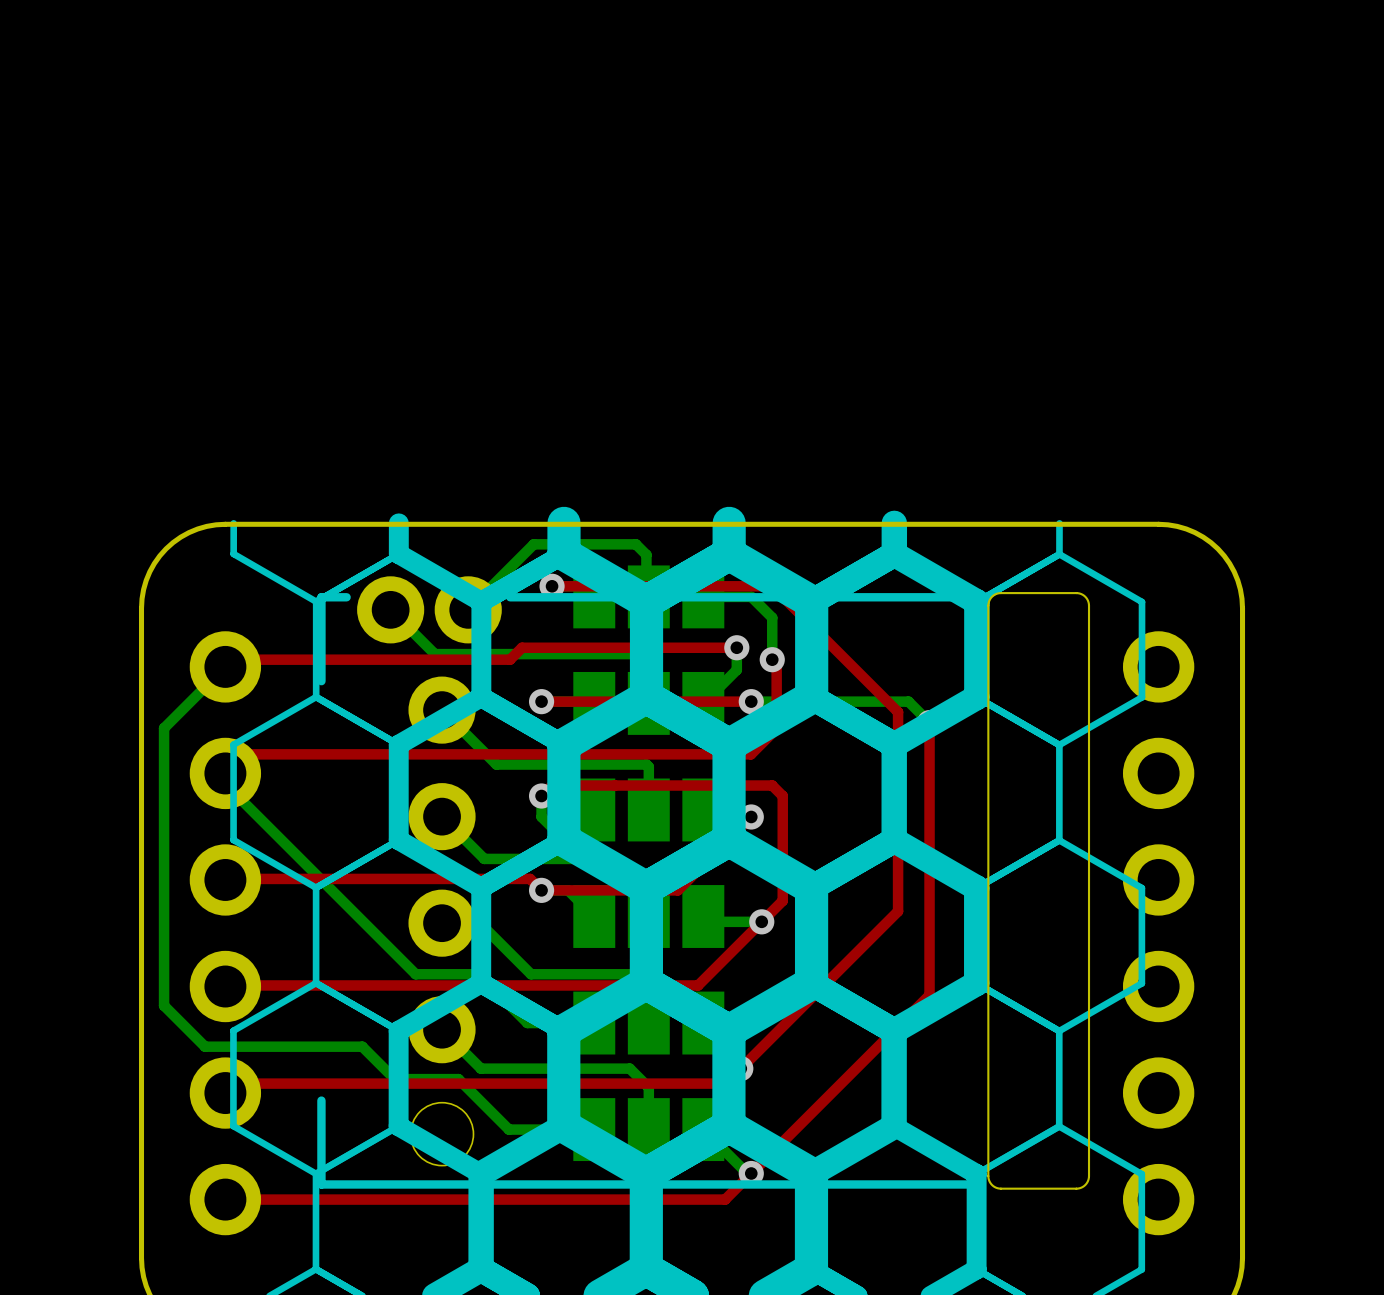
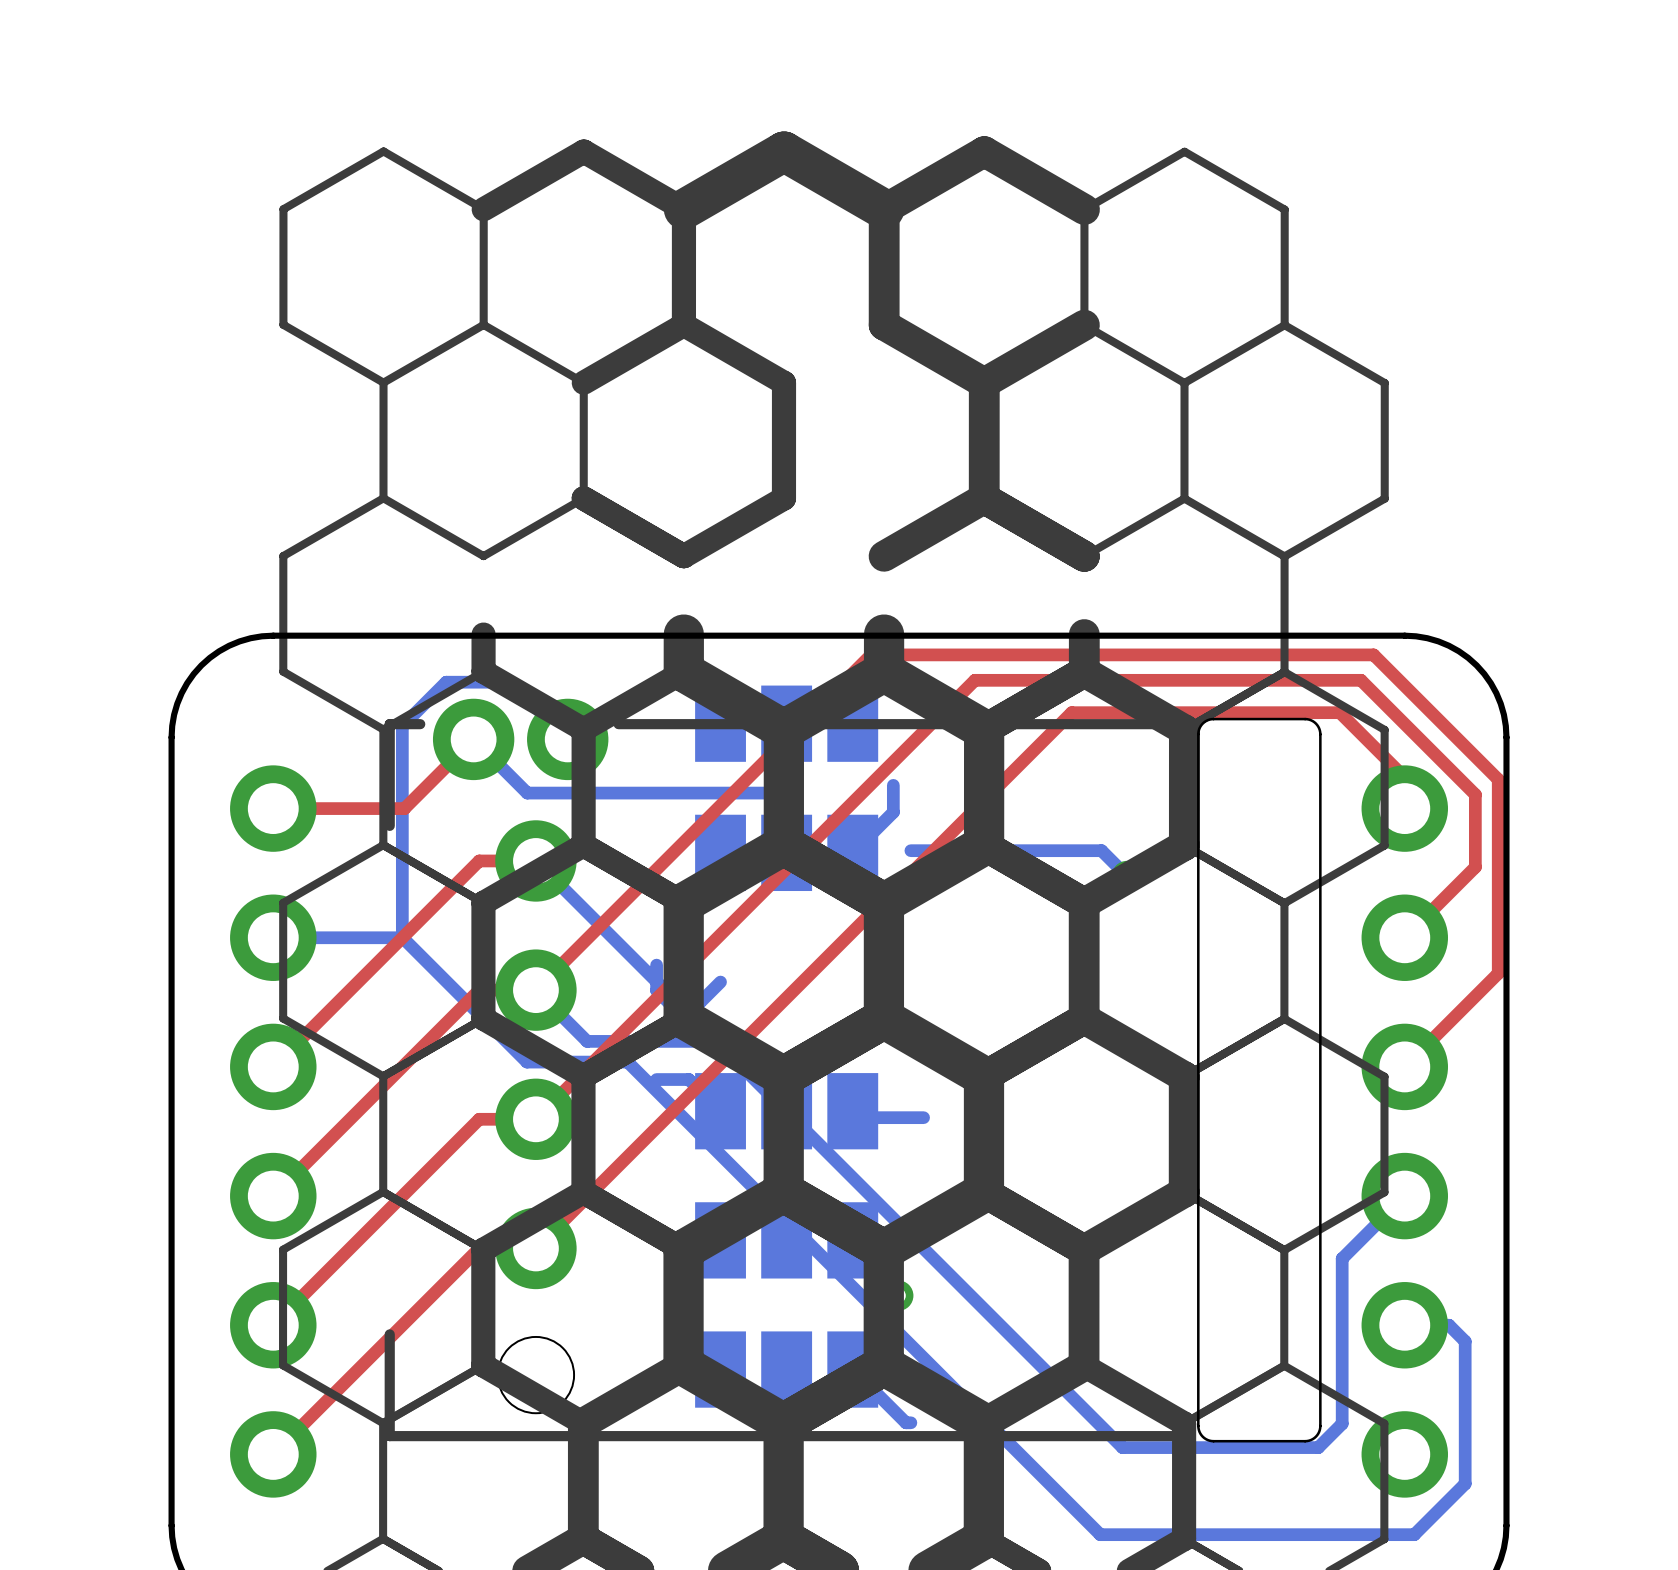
line: none -> (483, 209) (483, 324)
line: none -> (483, 209) (383, 151) (283, 209) (283, 324) (383, 382)
line: none -> (483, 209) (583, 151) (683, 209)
line: none -> (683, 209) (784, 151) (884, 209)
line: none -> (683, 209) (683, 324)
line: none -> (884, 209) (884, 325) (984, 382)
line: none -> (884, 209) (984, 151) (1084, 209)
line: none -> (1084, 209) (1084, 325)
line: none -> (1084, 209) (1184, 151) (1284, 209) (1284, 325)
line: none -> (483, 324) (383, 382)
line: none -> (483, 324) (583, 382)
line: none -> (683, 324) (583, 382)
line: none -> (683, 324) (784, 382) (783, 498) (683, 556)
line: none -> (1084, 325) (1184, 382)
line: none -> (1084, 325) (984, 382)
line: none -> (1284, 325) (1384, 383) (1384, 498) (1284, 556)
line: none -> (1284, 325) (1184, 382)
line: none -> (383, 382) (383, 498)
line: none -> (583, 382) (583, 498)
line: none -> (984, 382) (984, 498)
line: none -> (1184, 382) (1184, 498)
line: none -> (383, 498) (483, 556) (583, 498)
line: none -> (984, 498) (884, 556)
line: none -> (1184, 498) (1084, 556)
line: none -> (1184, 498) (1284, 556)
line: (233, 523) (233, 553) -> (383, 498) (283, 556) (283, 671)
line: (1059, 523) (1059, 554) -> (1284, 556) (1284, 672)
top track: (552, 586) (772, 586) (898, 712) (898, 911) (725, 1083) (234, 1083) -> (1404, 937) (1475, 867) (1475, 794) (1361, 680) (974, 680) (535, 1119) (479, 1119) (284, 1313)
via: (552, 586) -> none
bottom track: (648, 596) (646, 594) (646, 554) (635, 544) (533, 544) (468, 609) -> (1404, 1325) (1449, 1325) (1465, 1341) (1465, 1483) (1414, 1534) (1100, 1534) (627, 1062) (526, 1062) (402, 937) (402, 726) (446, 682) (510, 682) (567, 739)
bottom track: (703, 596) (751, 596) (772, 617) (772, 659) -> none
top track: (736, 647) (522, 647) (510, 659) (232, 659) (225, 666) -> (473, 739) (404, 808) (273, 808)
via: (736, 647) -> none
top track: (772, 659) (776, 664) (776, 728) (750, 754) (244, 754) (225, 773) -> none
via: (772, 659) -> none
bottom track: (225, 666) (164, 728) (164, 1005) (205, 1046) (362, 1046) (394, 1079) (458, 1079) (508, 1129) (594, 1129) -> none
top track: (541, 701) (751, 701) -> none
via: (541, 701) -> none
via: (751, 701) -> none
top track: (929, 722) (929, 995) (725, 1199) (225, 1199) -> (1404, 808) (1404, 777) (1339, 712) (1071, 712) (535, 1248) (479, 1248) (273, 1454)
bottom track: (496, 764) (646, 764) (648, 766) (648, 809) -> (601, 926) (1122, 1447) (1318, 1447) (1342, 1423) (1342, 1258) (1404, 1196)
bottom track: (225, 773) (225, 783) (415, 974) (478, 974) (527, 1023) (594, 1023) -> (273, 937) (402, 937)
top track: (541, 796) (552, 785) (772, 785) (782, 796) (782, 900) (698, 985) (226, 985) -> (1404, 1066) (1498, 973) (1498, 779) (1373, 654) (871, 654) (535, 990) (479, 990) (274, 1194)
via: (541, 796) -> none
part: (648, 809) -> none
top track: (751, 816) (677, 890) (541, 890) (530, 878) (226, 878) -> (535, 860) (479, 860) (274, 1065)
via: (751, 816) -> none
via: (541, 890) -> none
via: (761, 921) -> none
bottom track: (442, 923) (479, 923) (531, 974) (641, 974) (648, 981) (648, 1023) -> none
bottom track: (442, 1029) (480, 1068) (629, 1068) (648, 1087) (648, 1129) -> none
via: (751, 1173) -> none

